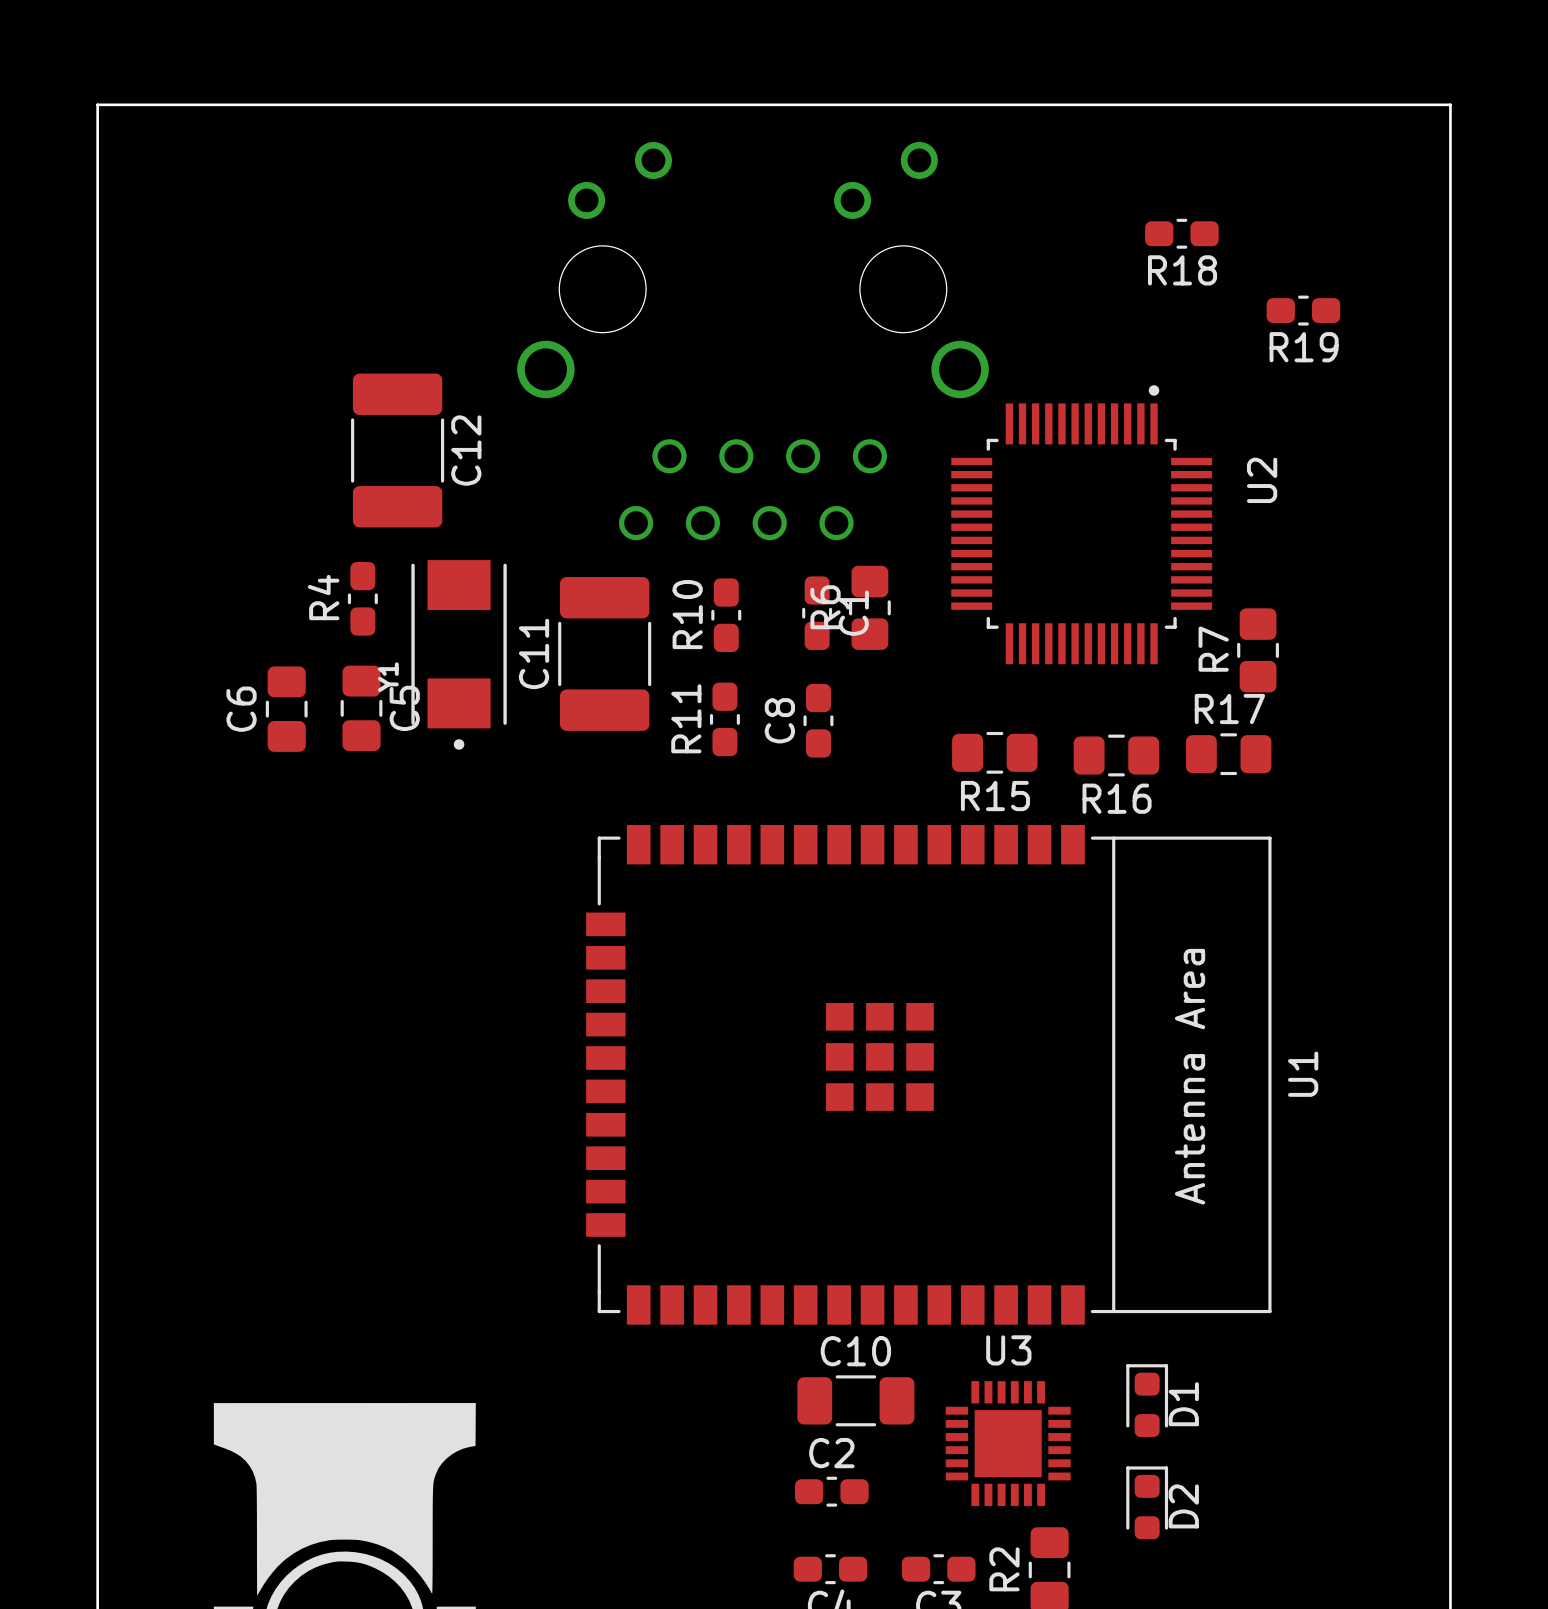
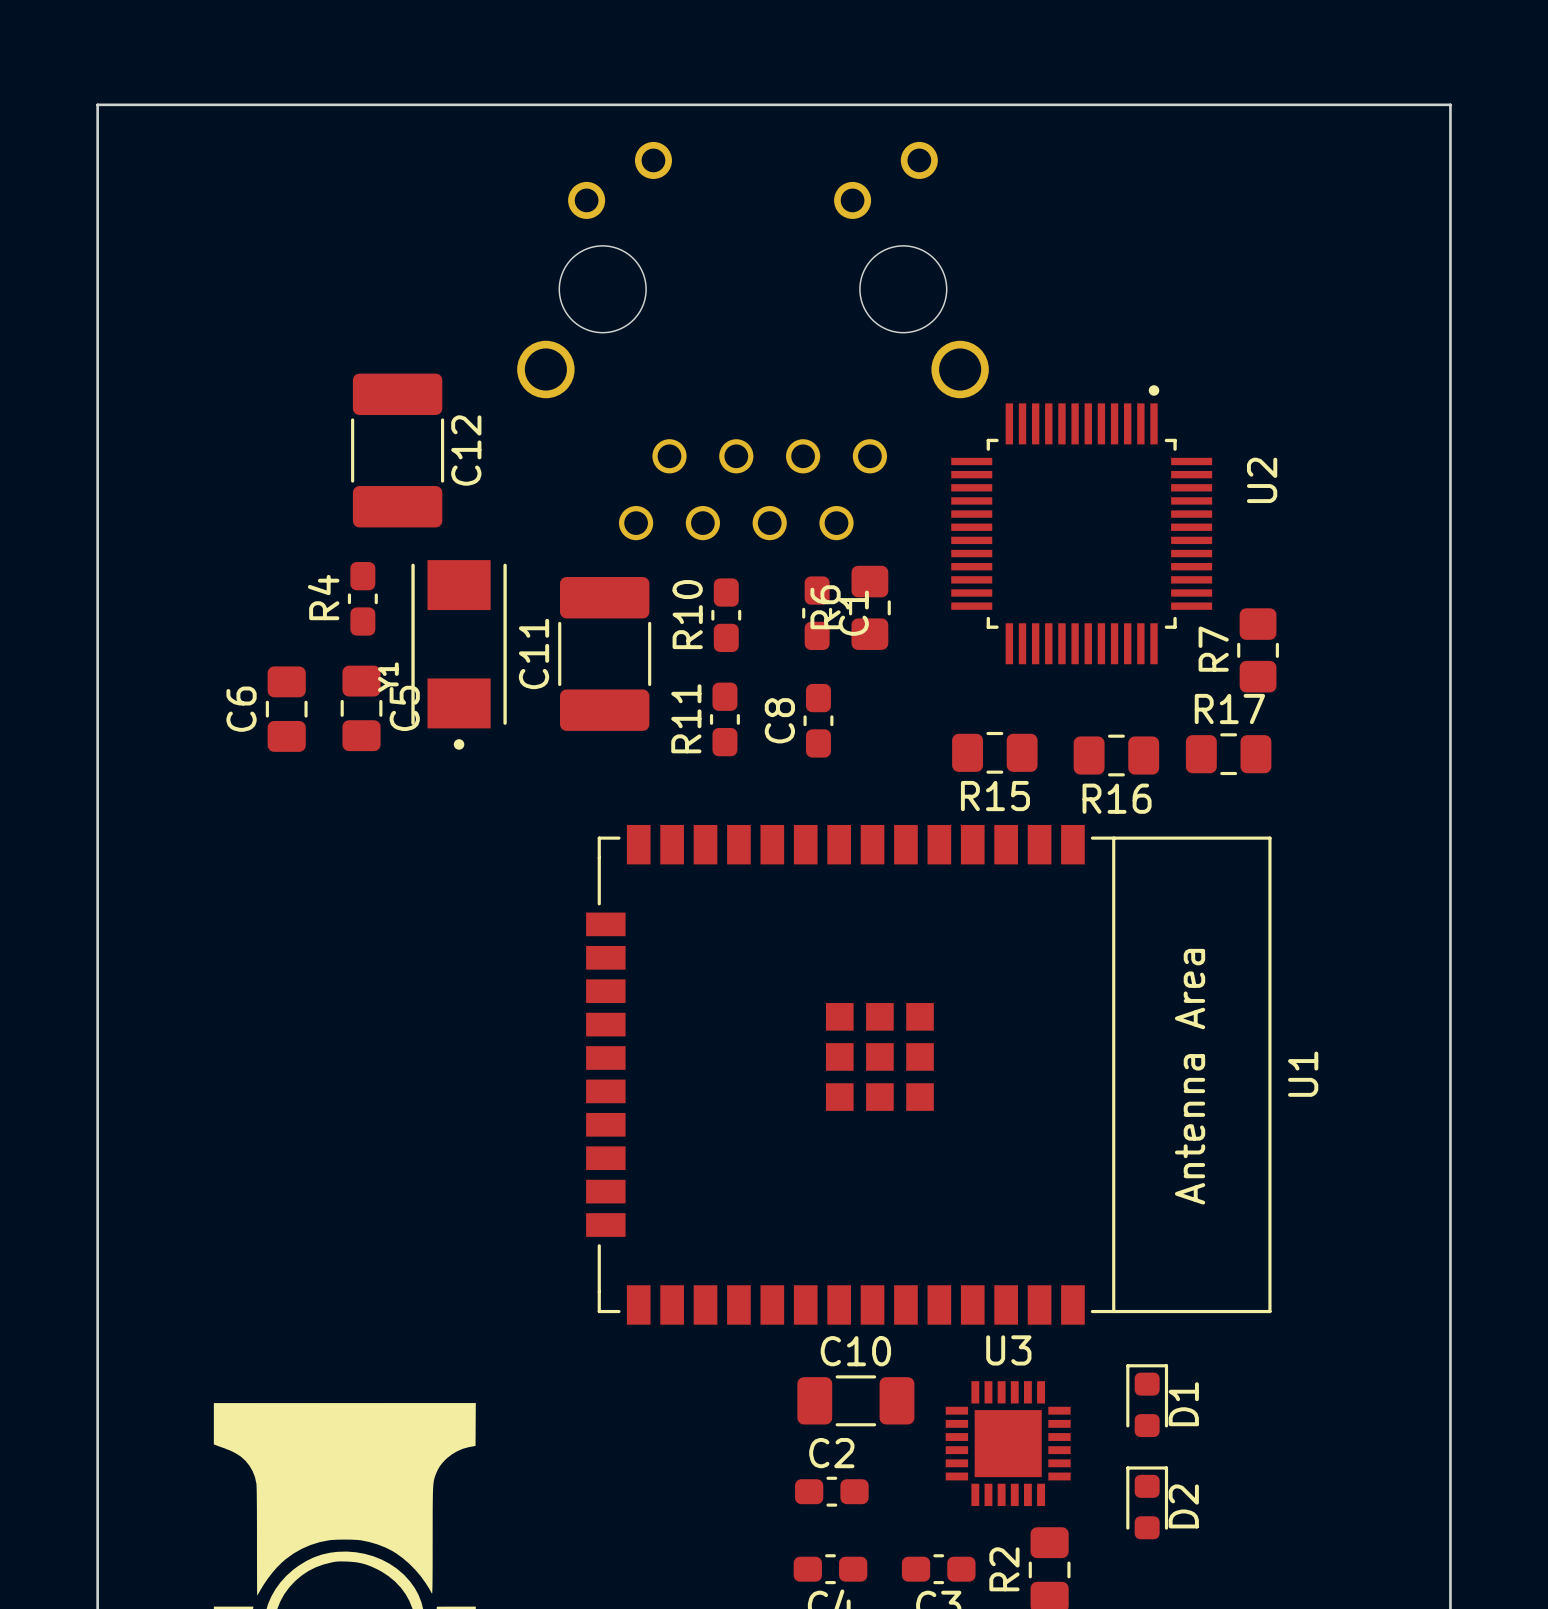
R18: (1181, 233) -> none
R19: (1303, 310) -> none

